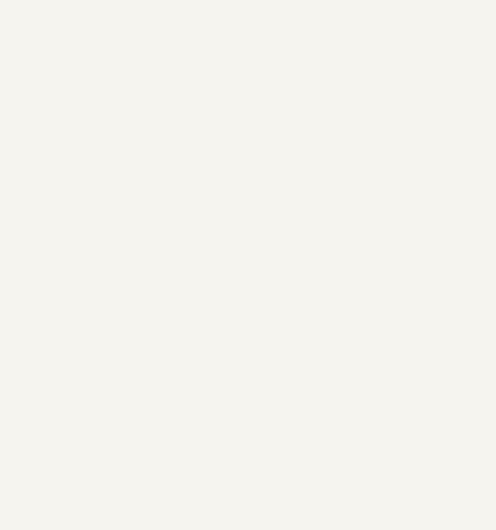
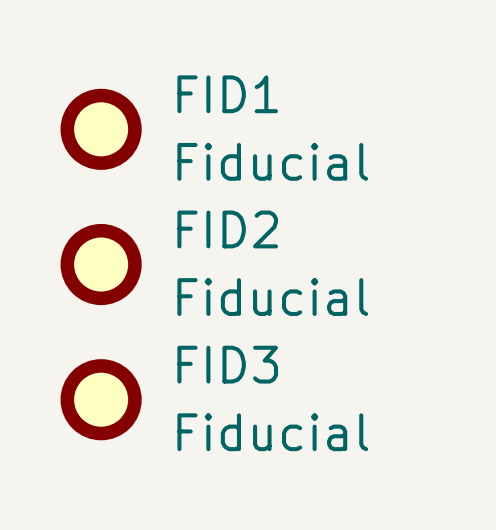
FID1: none -> Fiducial (101, 129)
FID2: none -> Fiducial (101, 264)
FID3: none -> Fiducial (101, 399)

